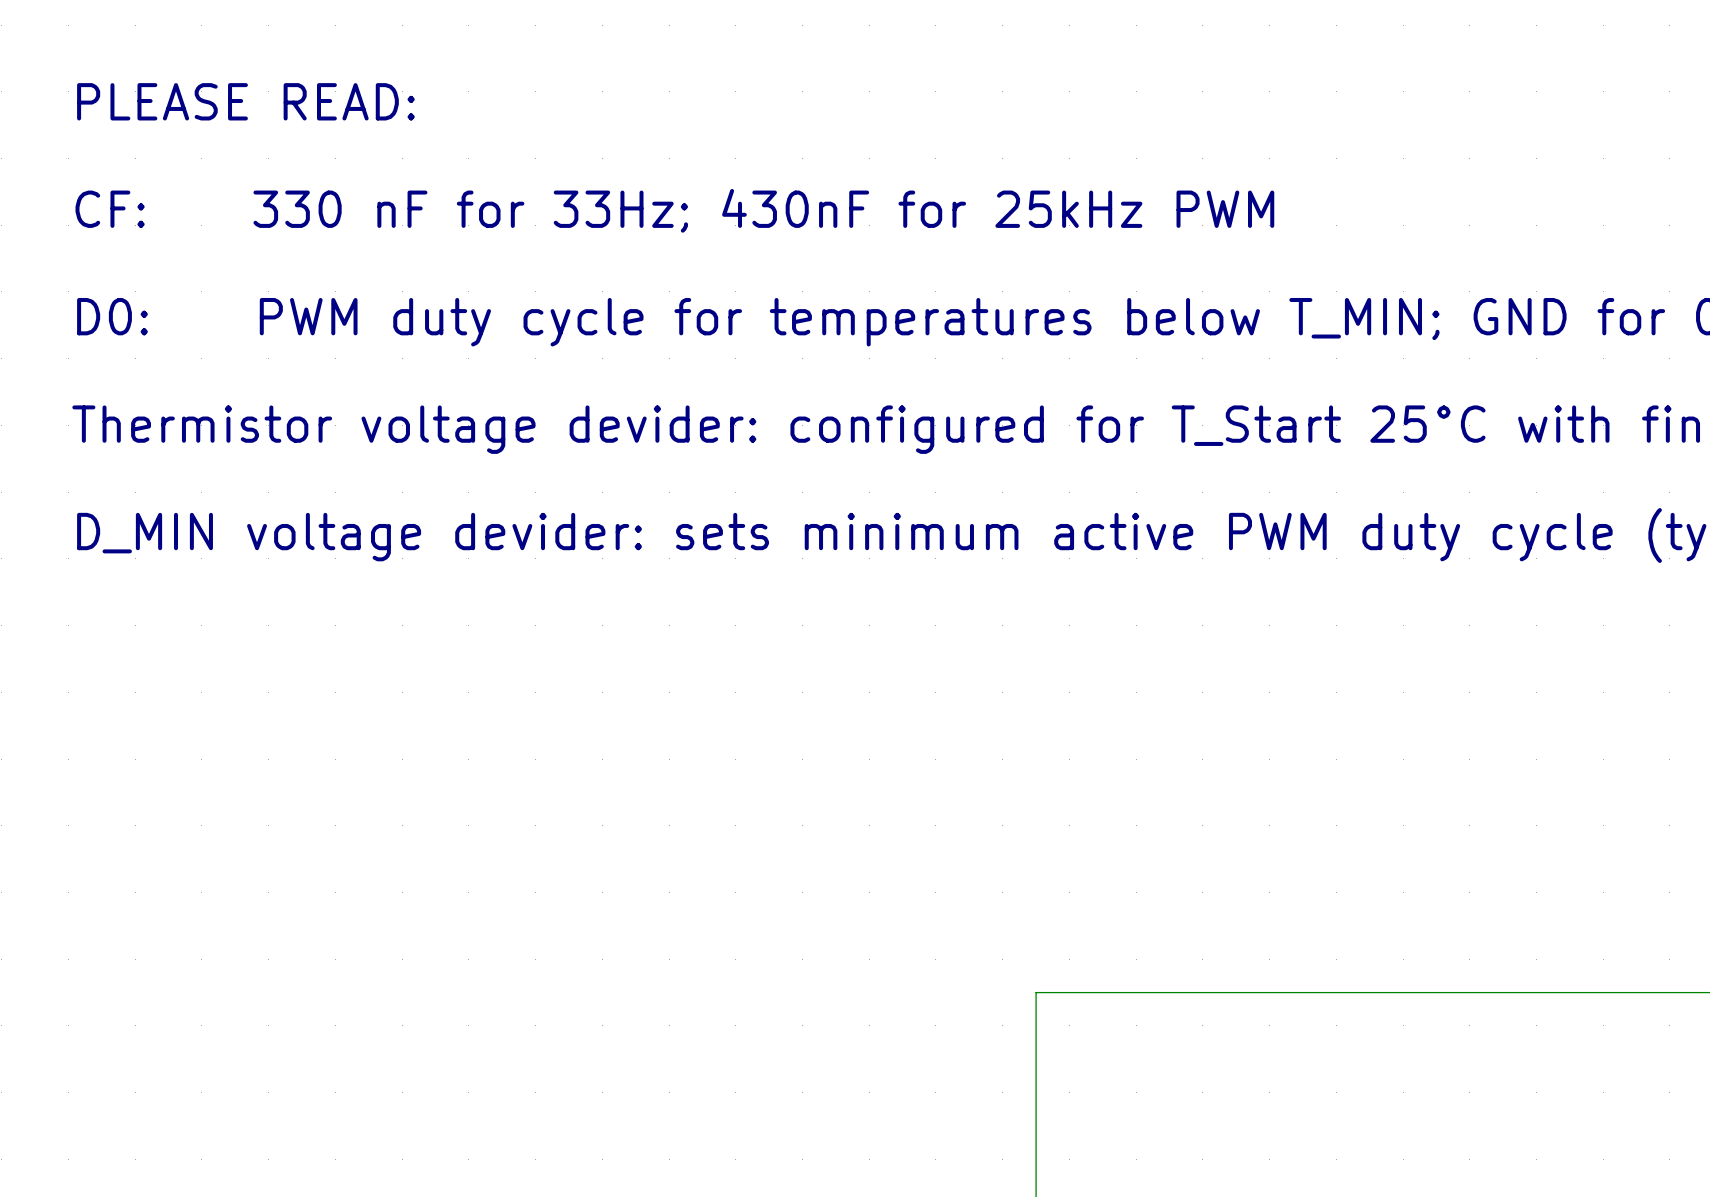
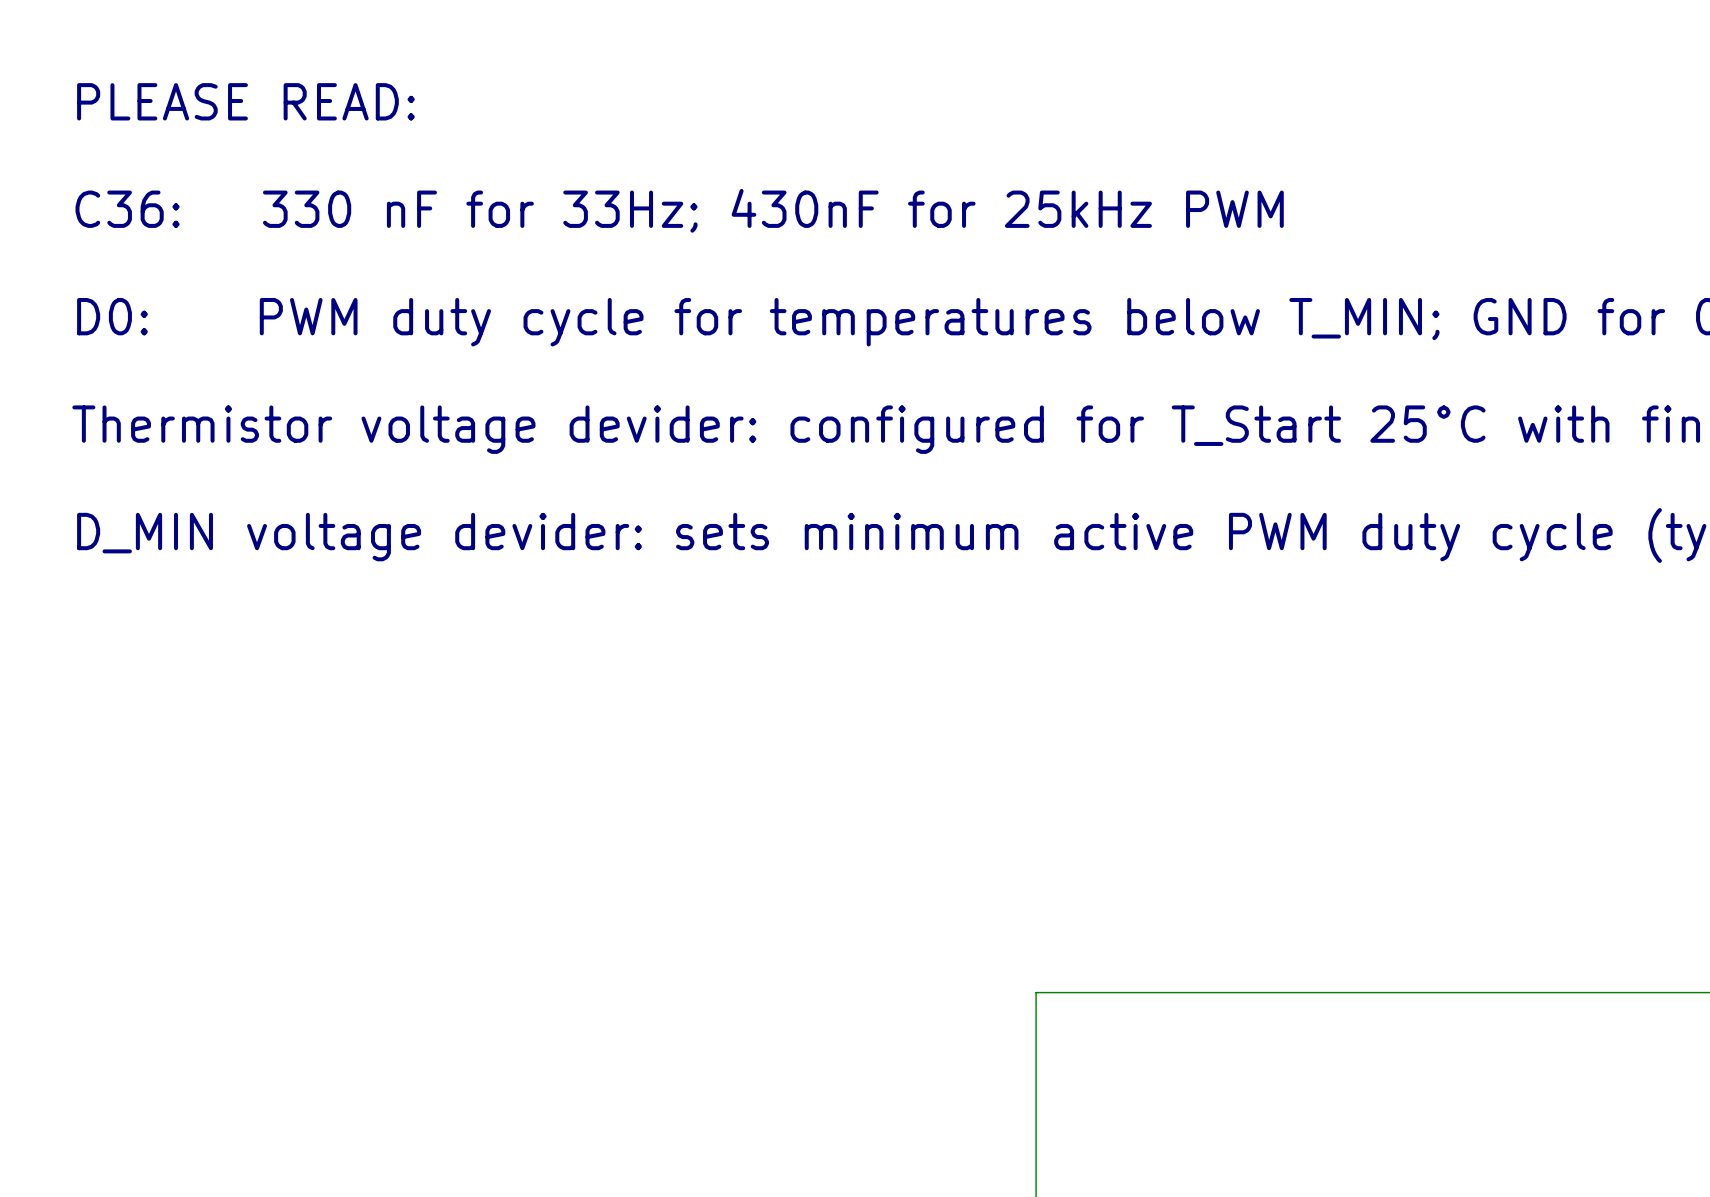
text: CF: 330 nF for 33Hz; 430nF for 25kHz PWM (674, 210) -> C36: 330 nF for 33Hz; 430nF for 25kHz PWM (679, 210)

